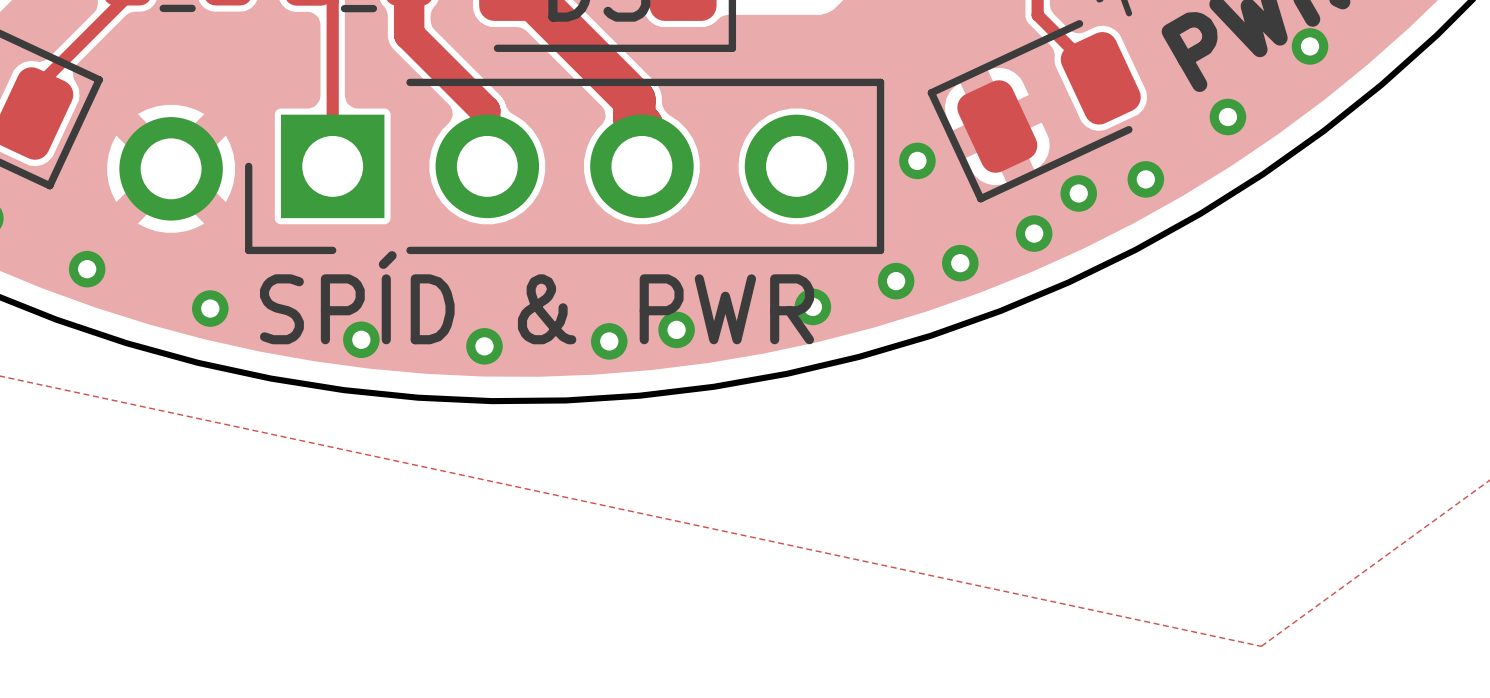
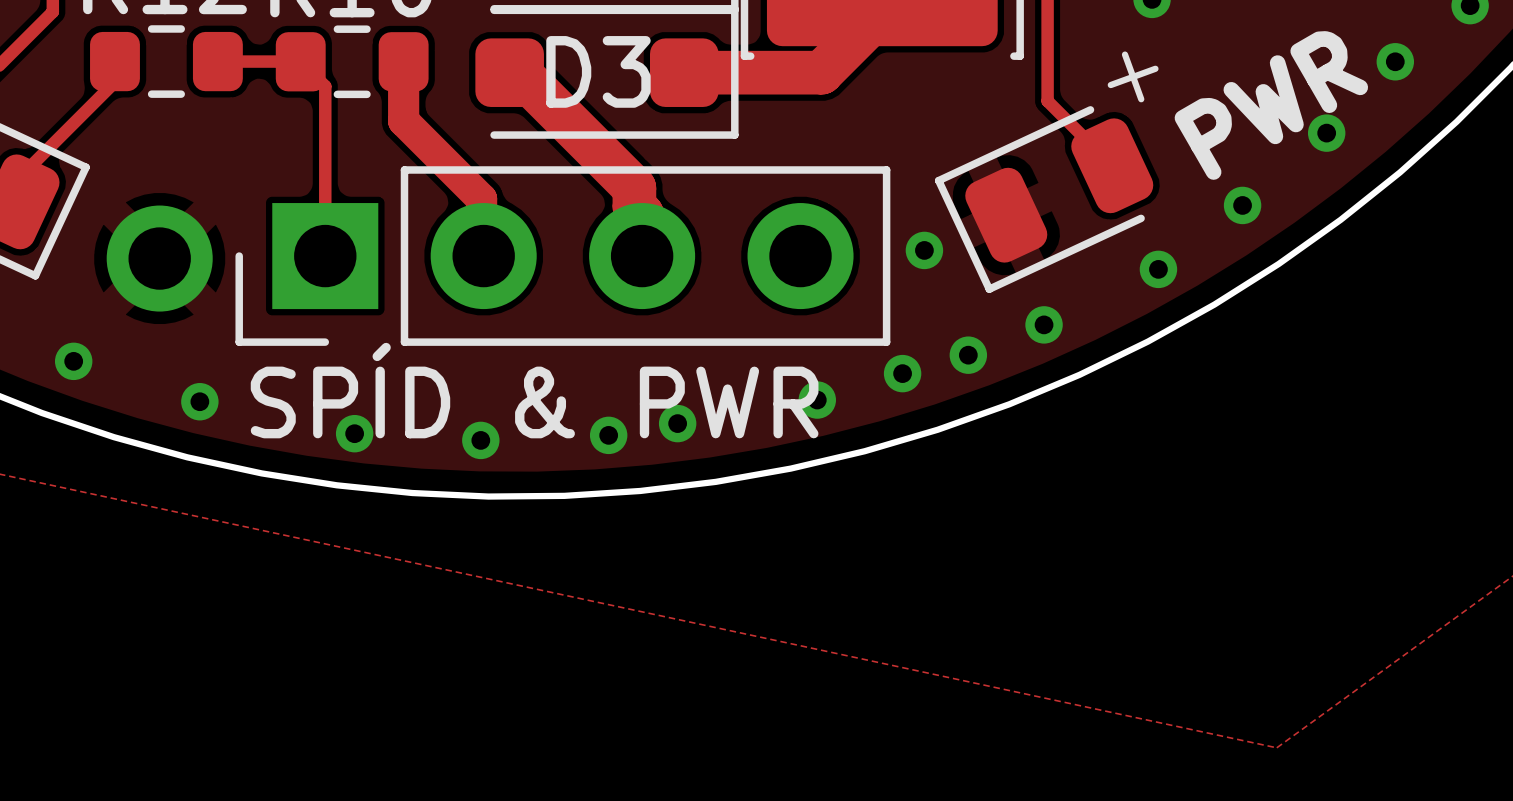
part footprint: [245, 78, 885, 255] -> [235, 166, 891, 346]
via: (1078, 193) -> none

